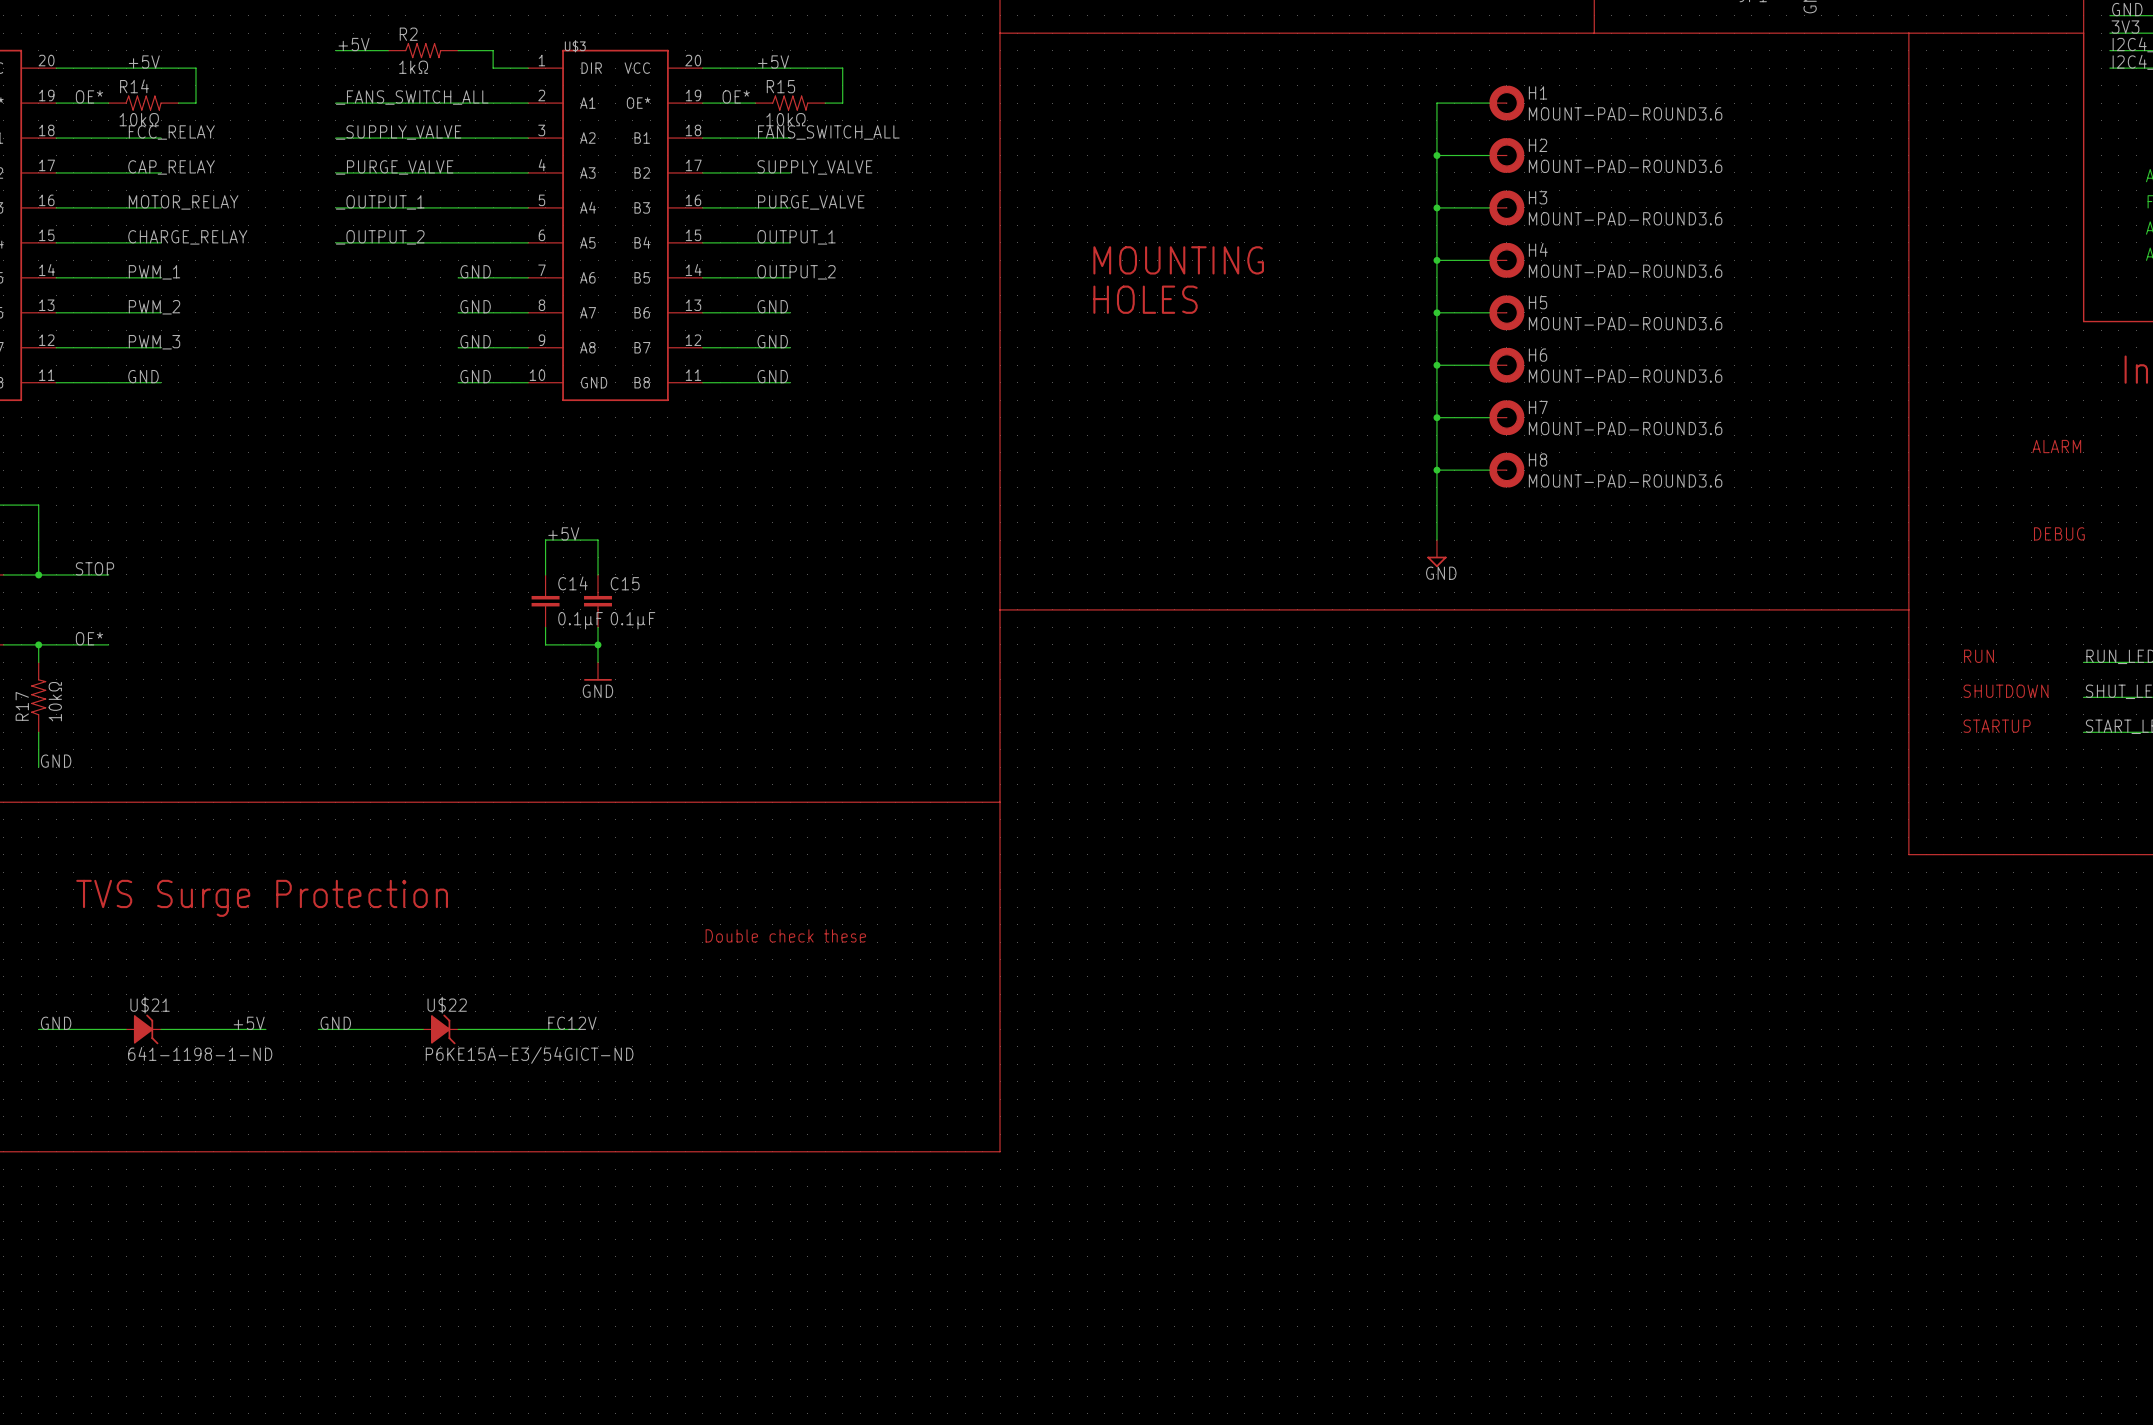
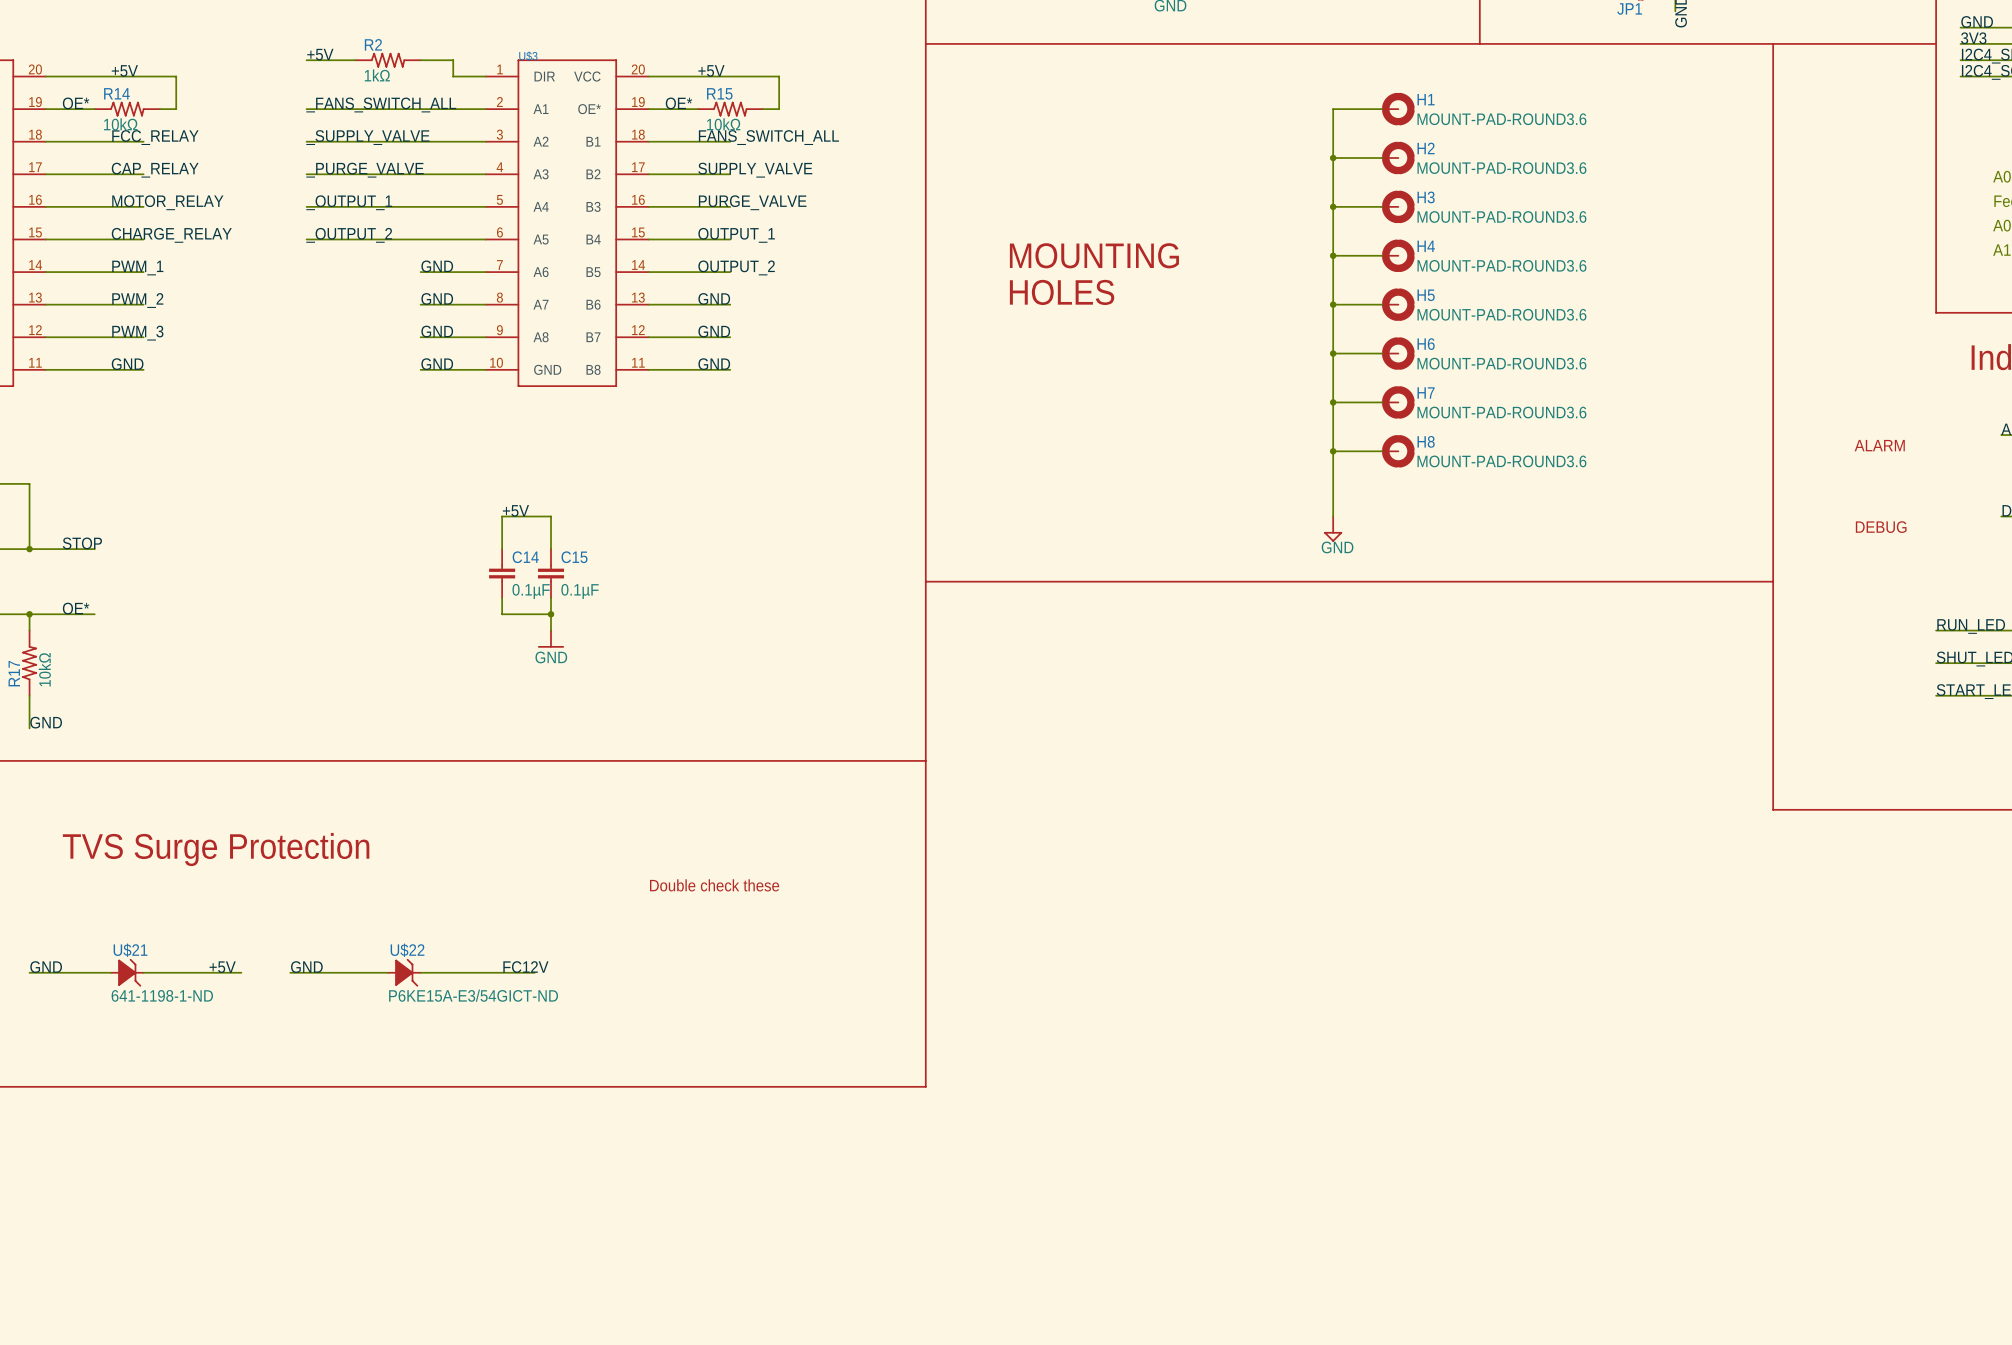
text position: ALARM (2056, 446) -> ALARM (1879, 445)
text position: DEBUG (2059, 533) -> DEBUG (1881, 527)
text: RUN (1979, 656) -> none
text: SHUTDOWN (2006, 691) -> none
text: STARTUP (1997, 726) -> none

